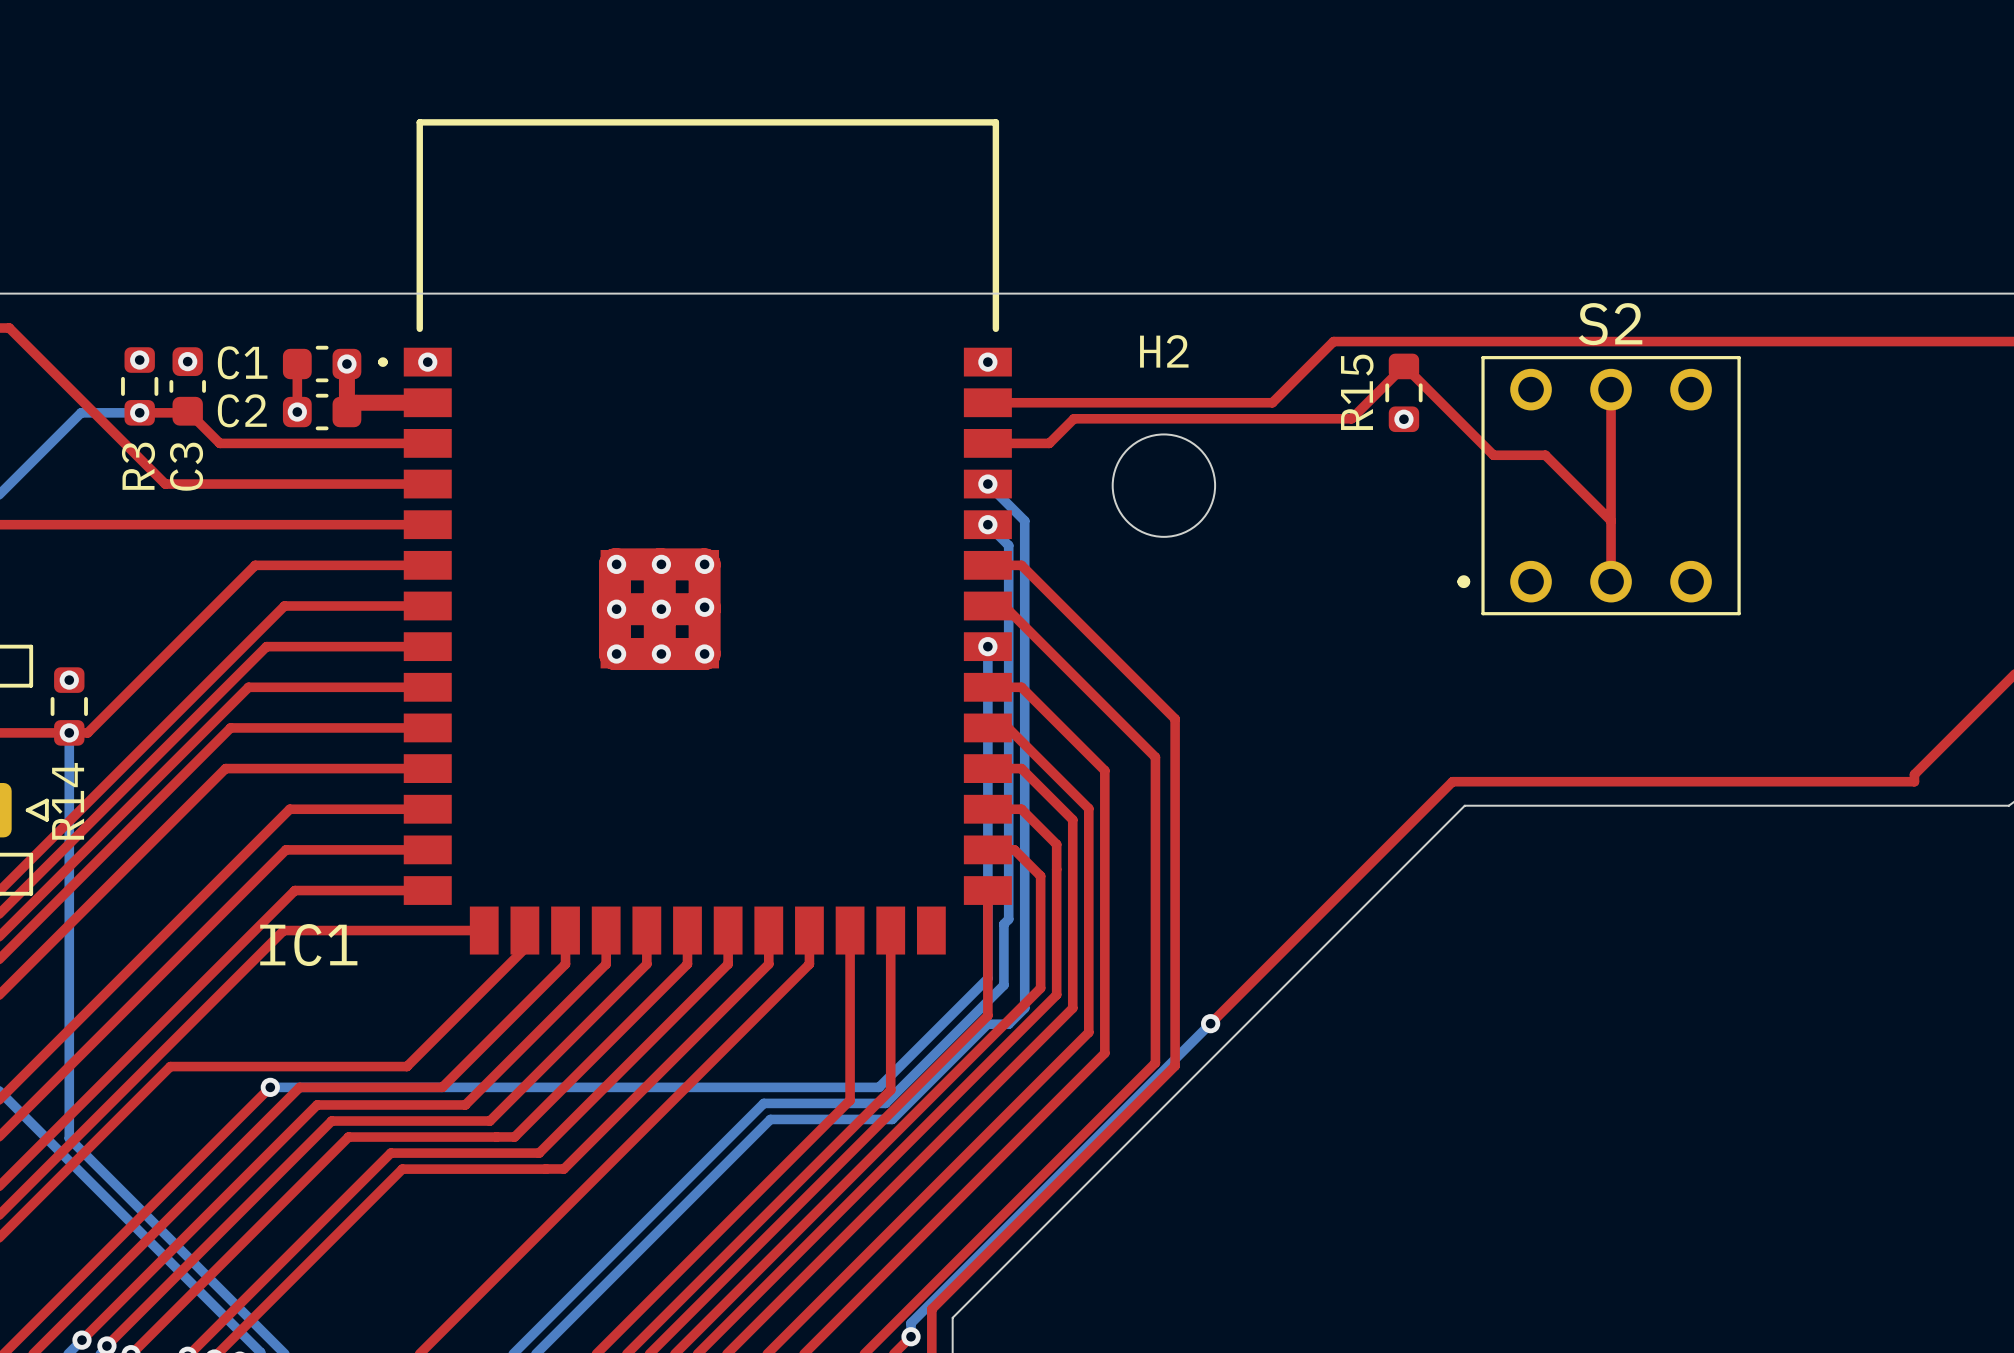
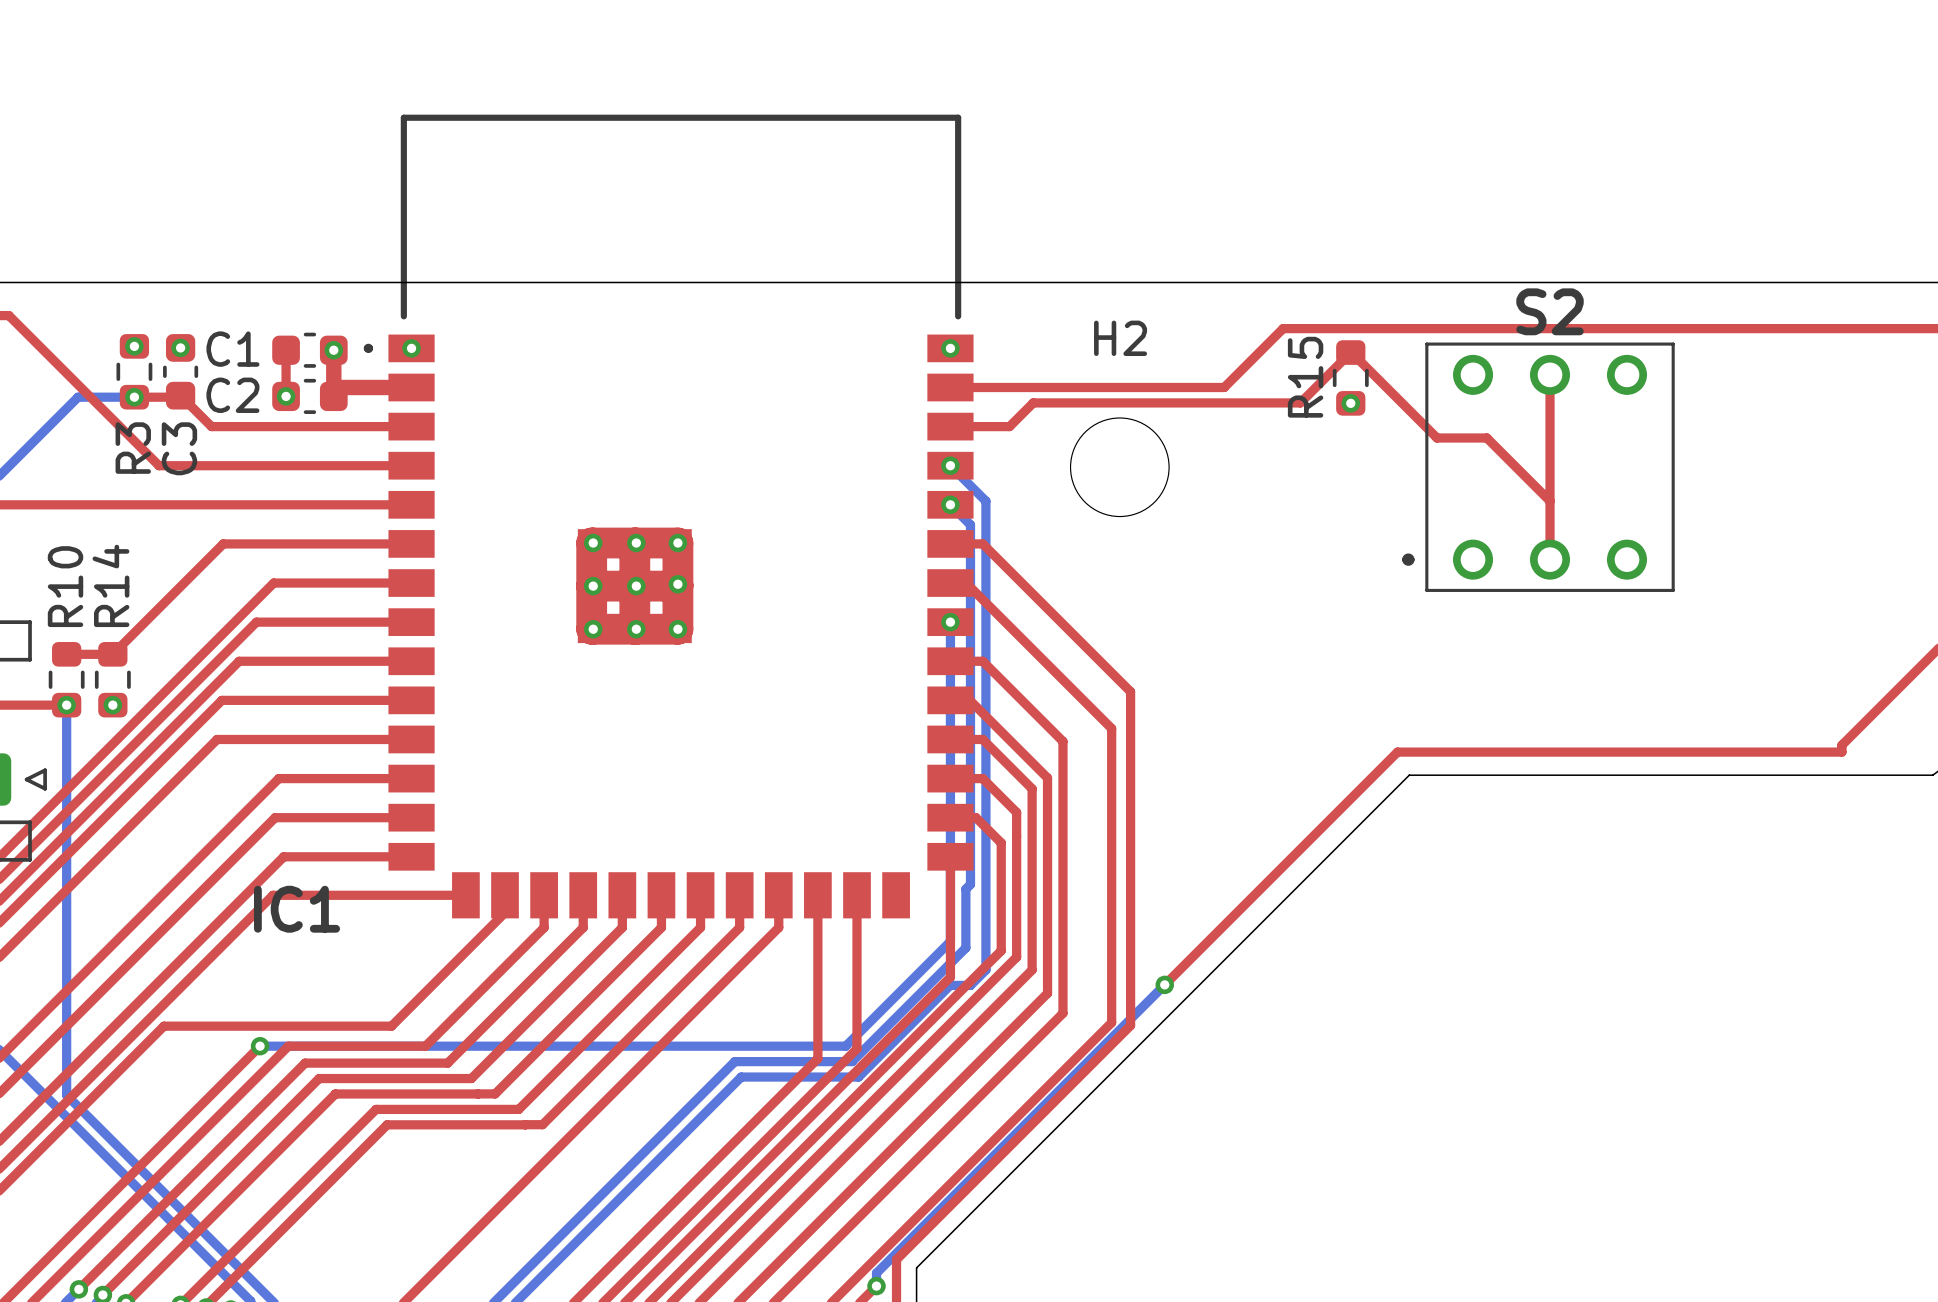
top track: (255, 565) (87, 732) (69, 732) -> (245, 543) (223, 543) (112, 654) (66, 654)
via position: (69, 680) -> (112, 705)
R14: none -> (112, 679)
R14 name: R14 (68, 801) -> R10 (65, 586)

